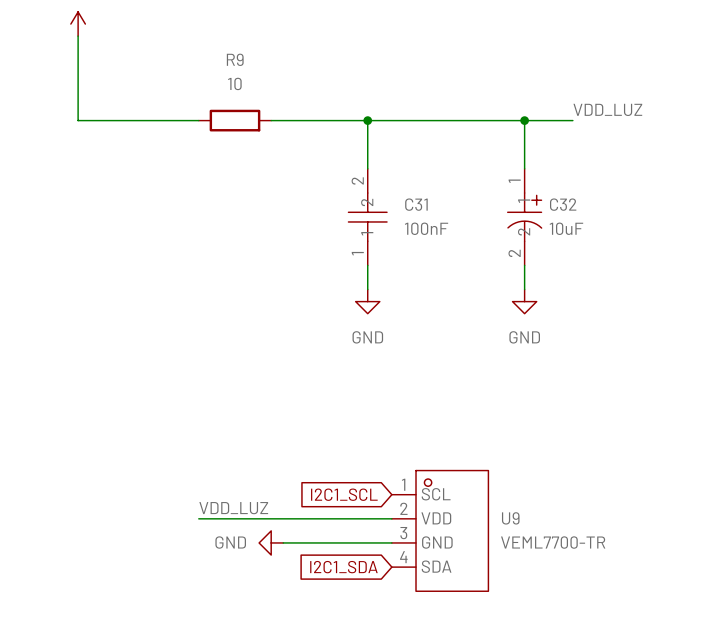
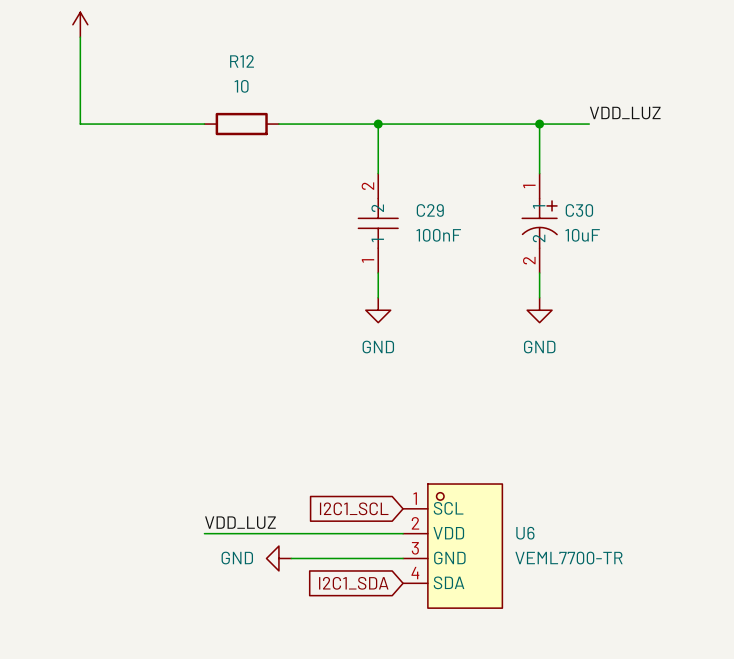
R9 name: R9 (235, 59) -> R12 (242, 61)
C31 name: C31 (416, 204) -> C29 (430, 210)
C32 name: C32 (563, 204) -> C30 (579, 210)
U9 name: U9 (510, 518) -> U6 (525, 533)

